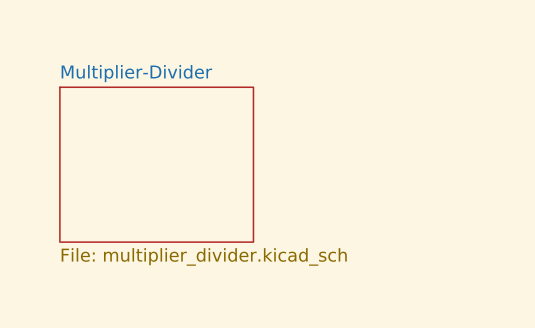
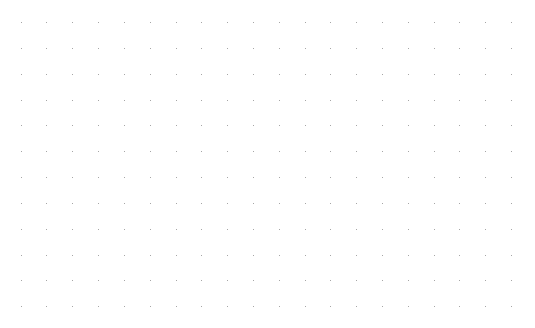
sheet Multiplier-Divider: File: multiplier_divider.kicad_sch (156, 164) -> none

